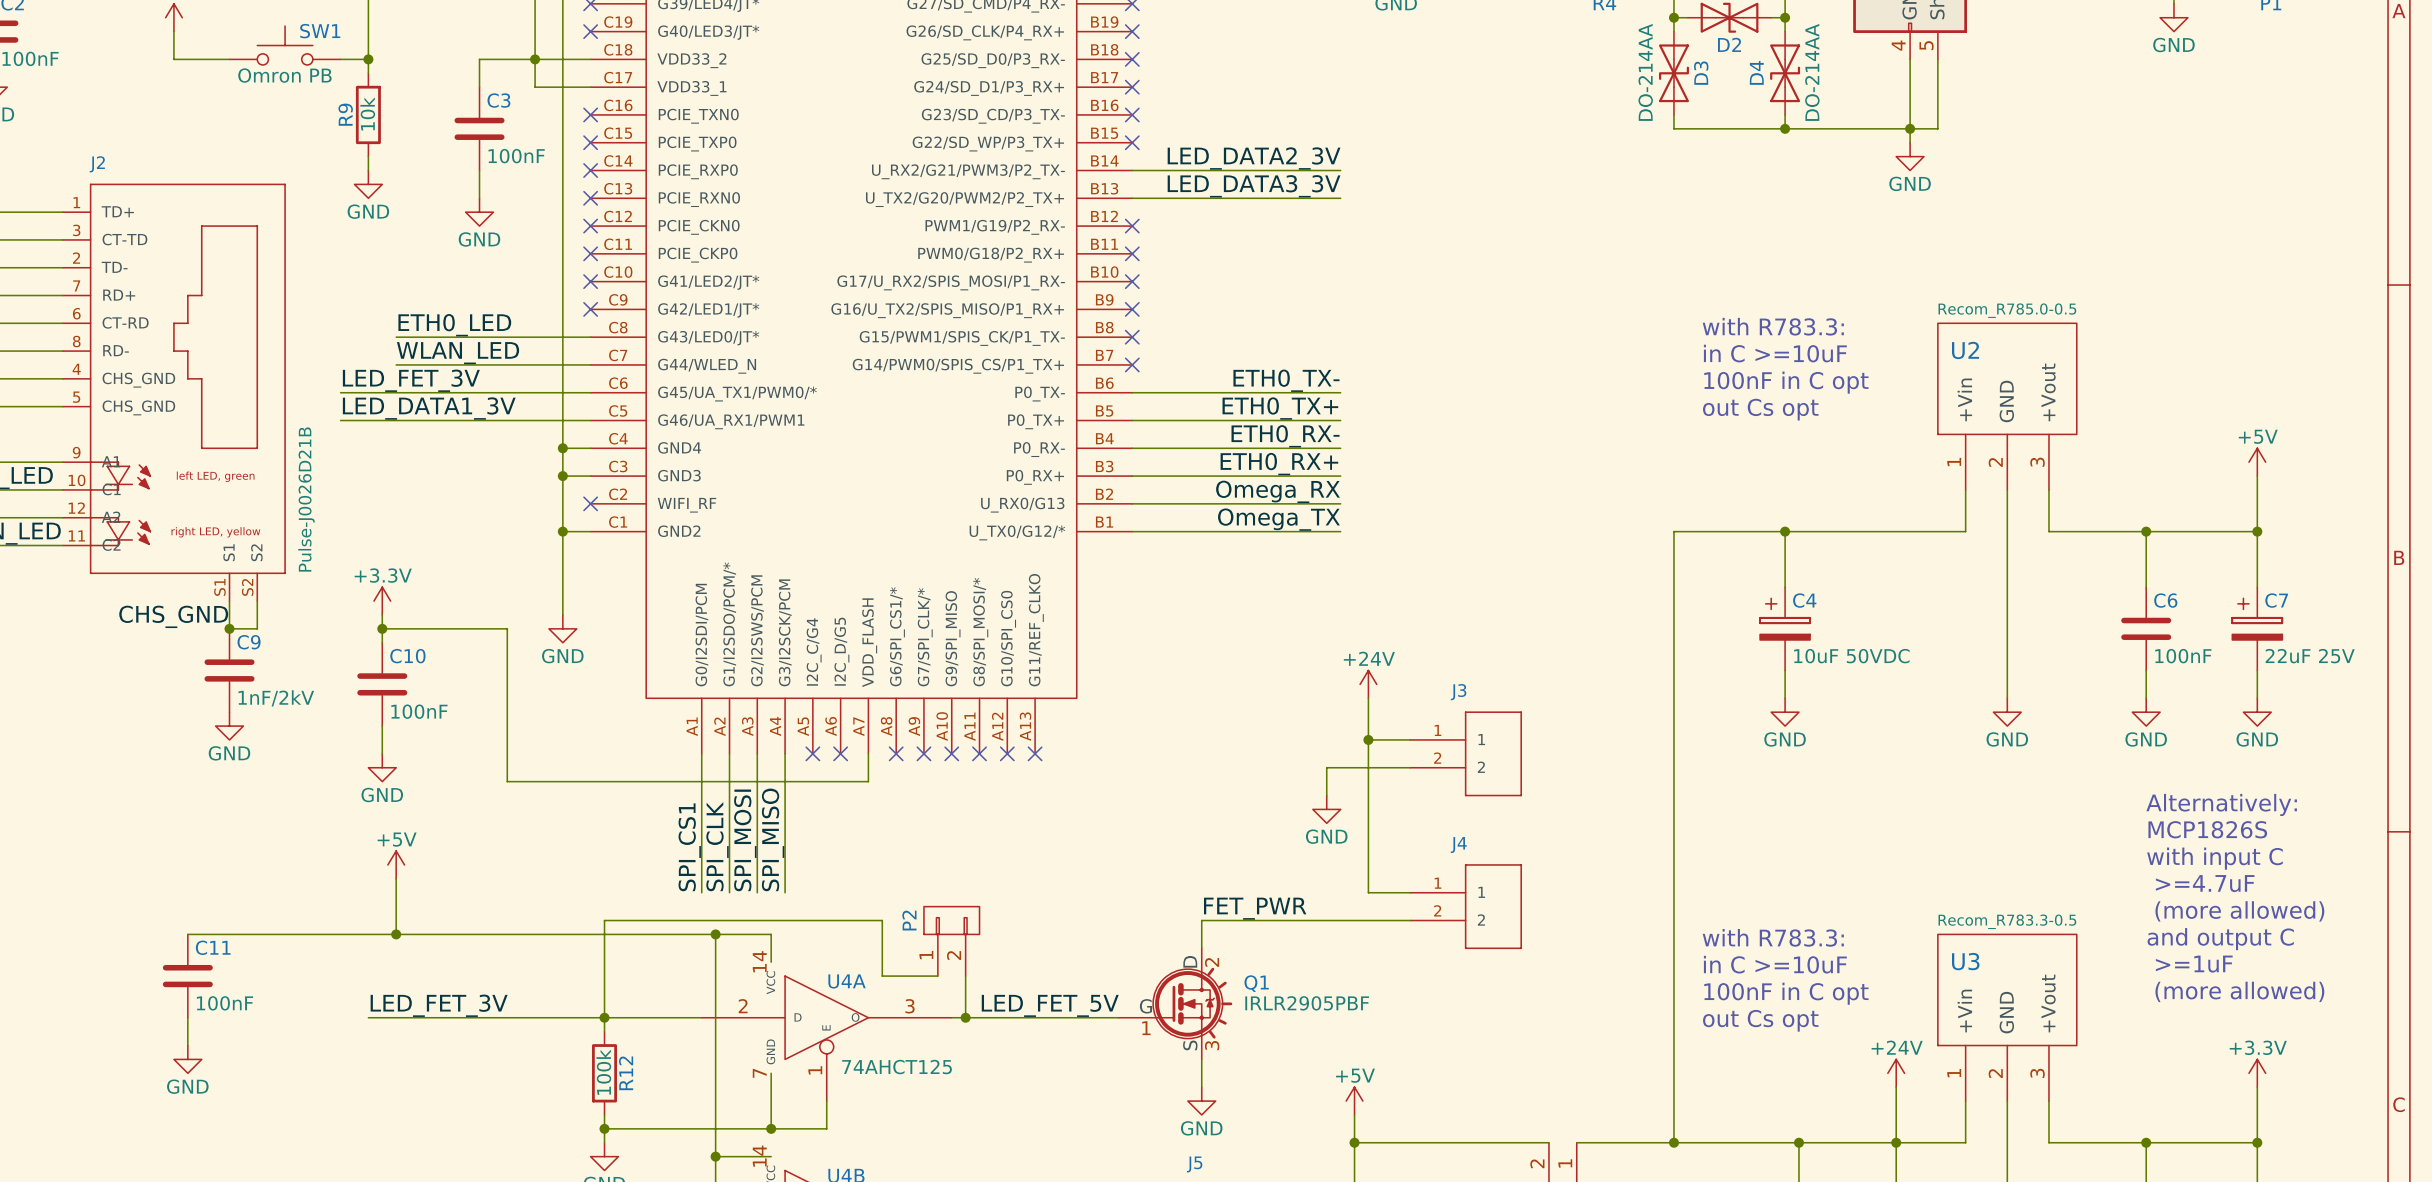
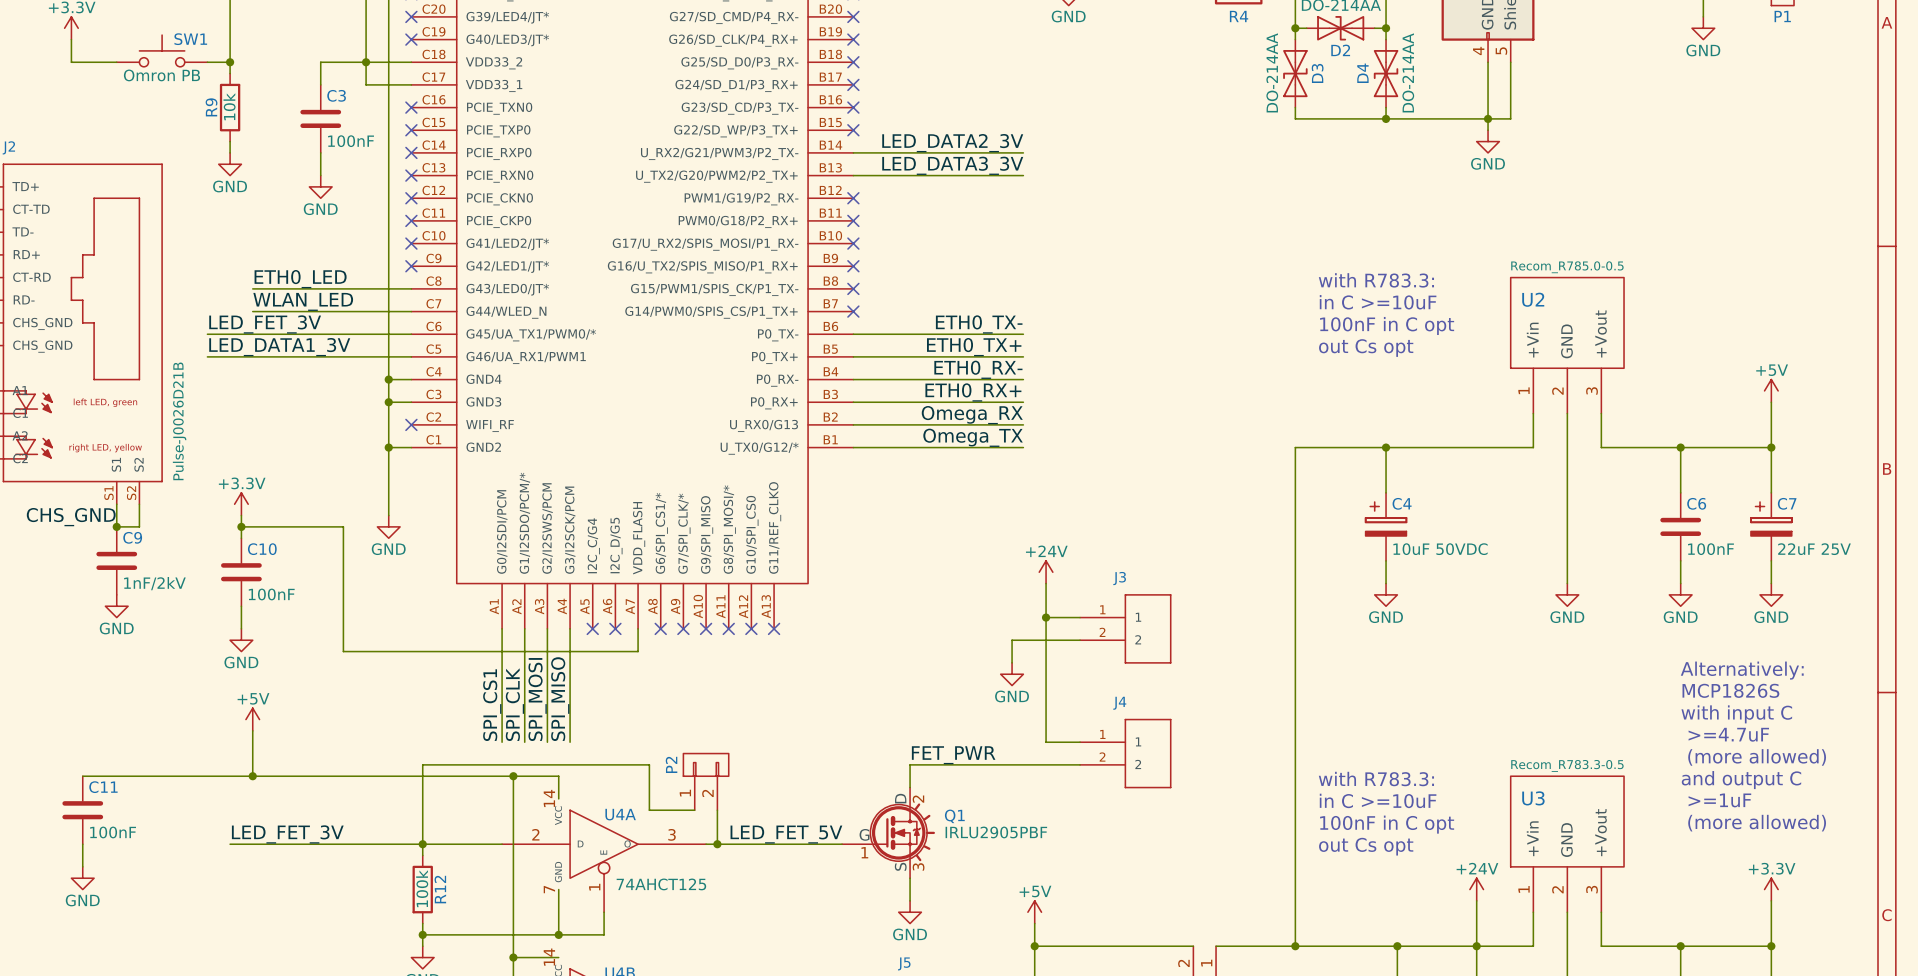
Q1 value: IRLR2905PBF (1307, 1003) -> IRLU2905PBF (996, 832)

